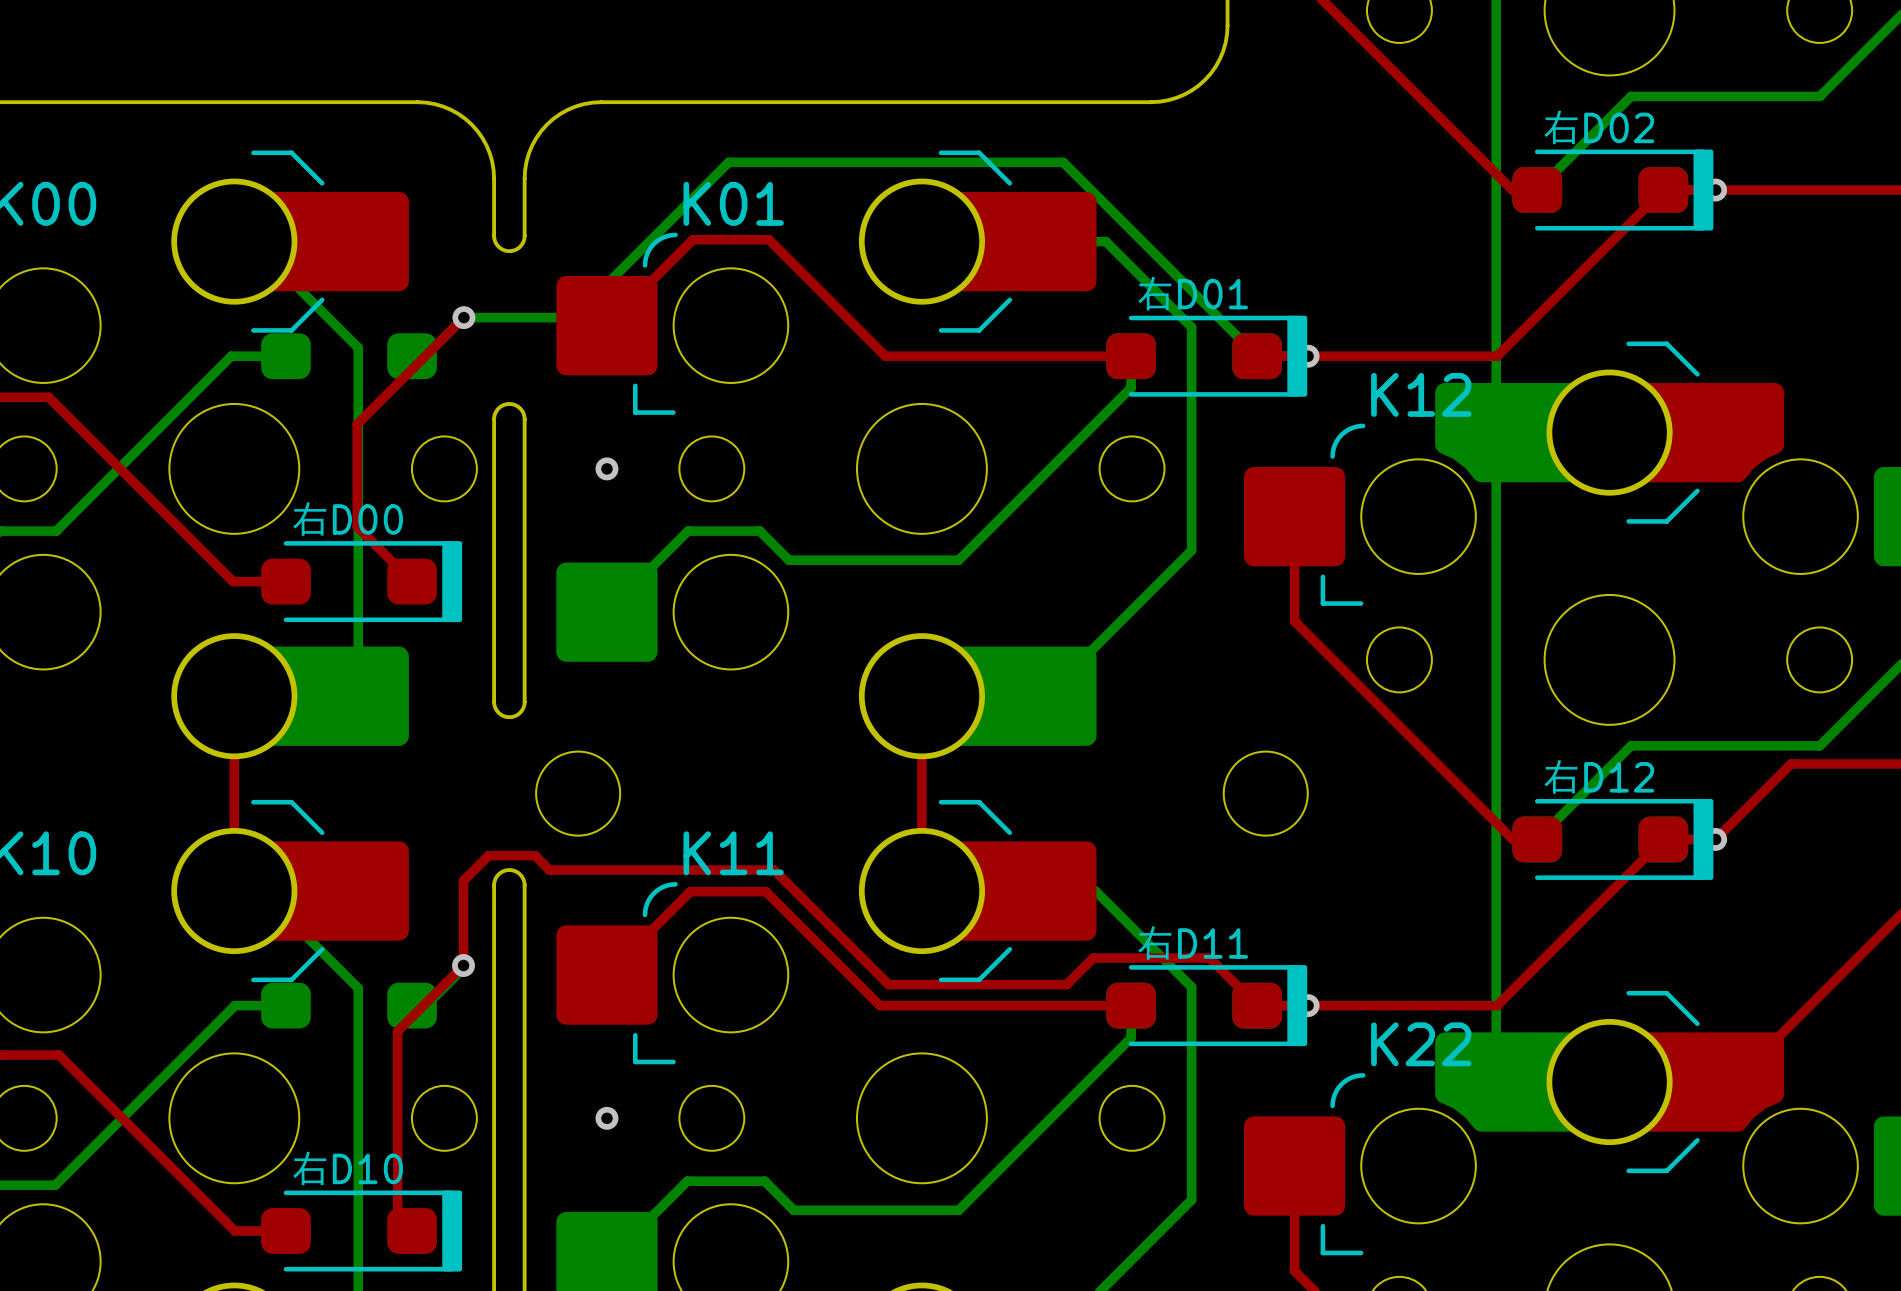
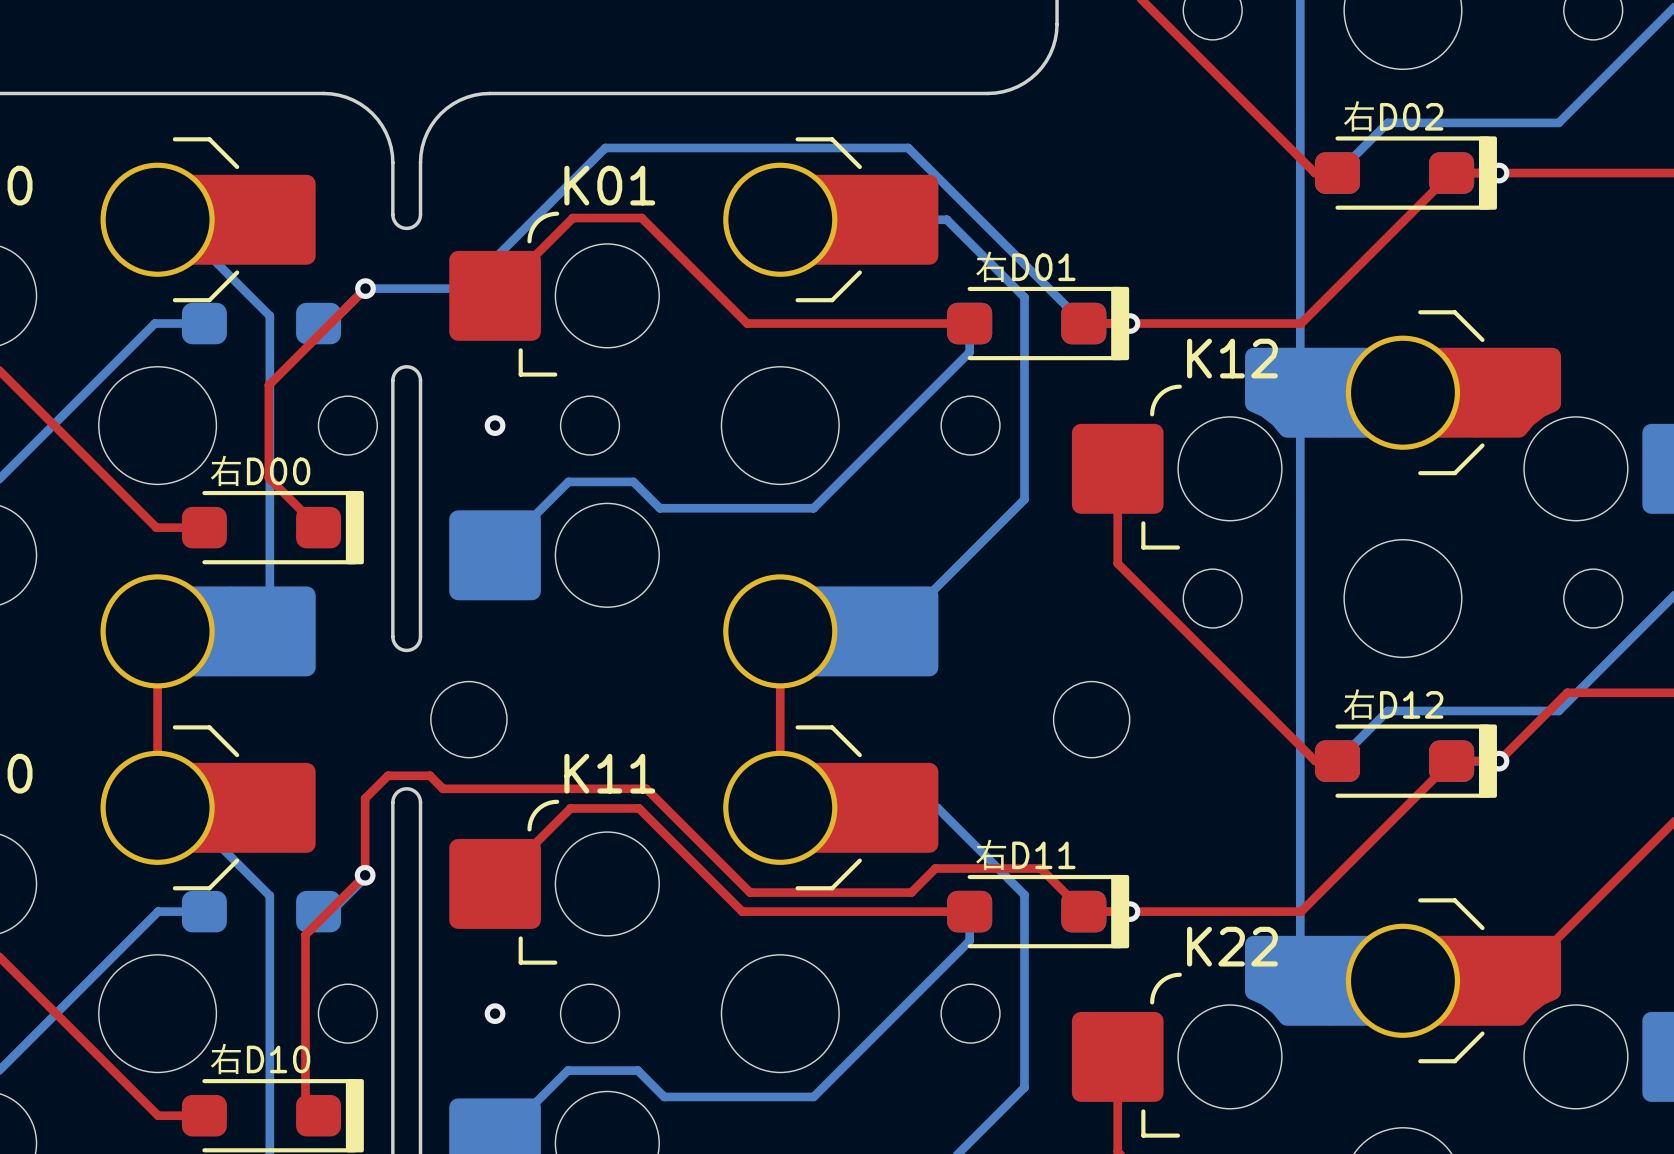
bottom track: (1819, 96) (1631, 96) (1592, 134) -> (1593, 88) (1558, 122) (1387, 122)
bottom track: (1819, 745) (1631, 745) (1592, 784) -> (1593, 676) (1558, 710) (1387, 710)

